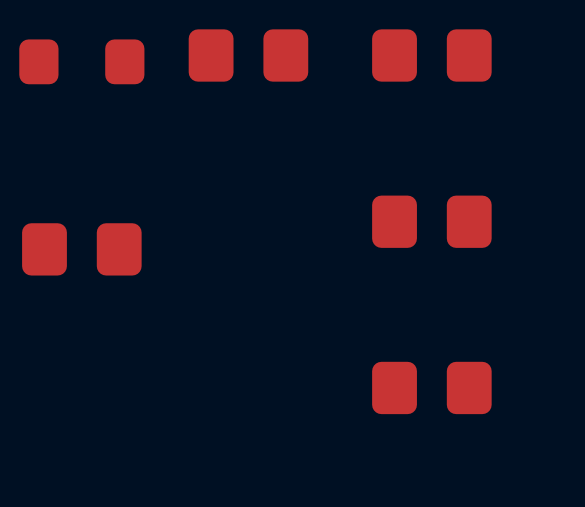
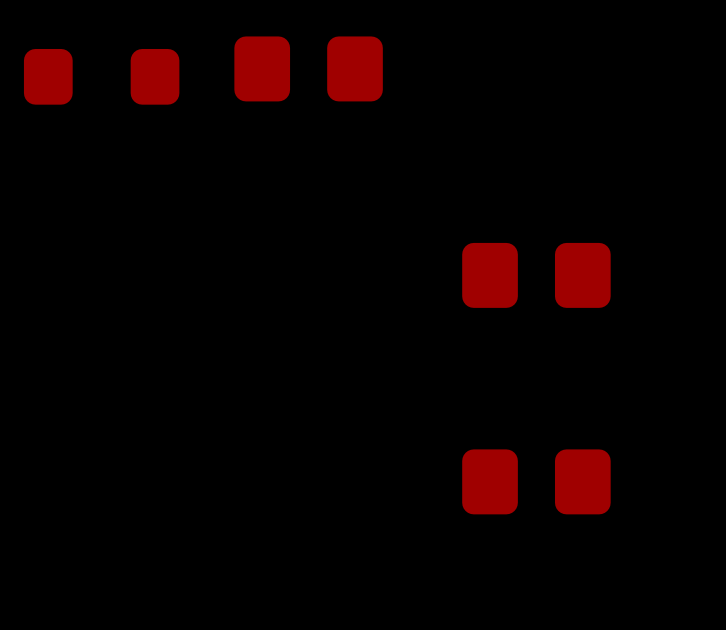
part: (431, 55) -> none
part: (81, 249) -> none

